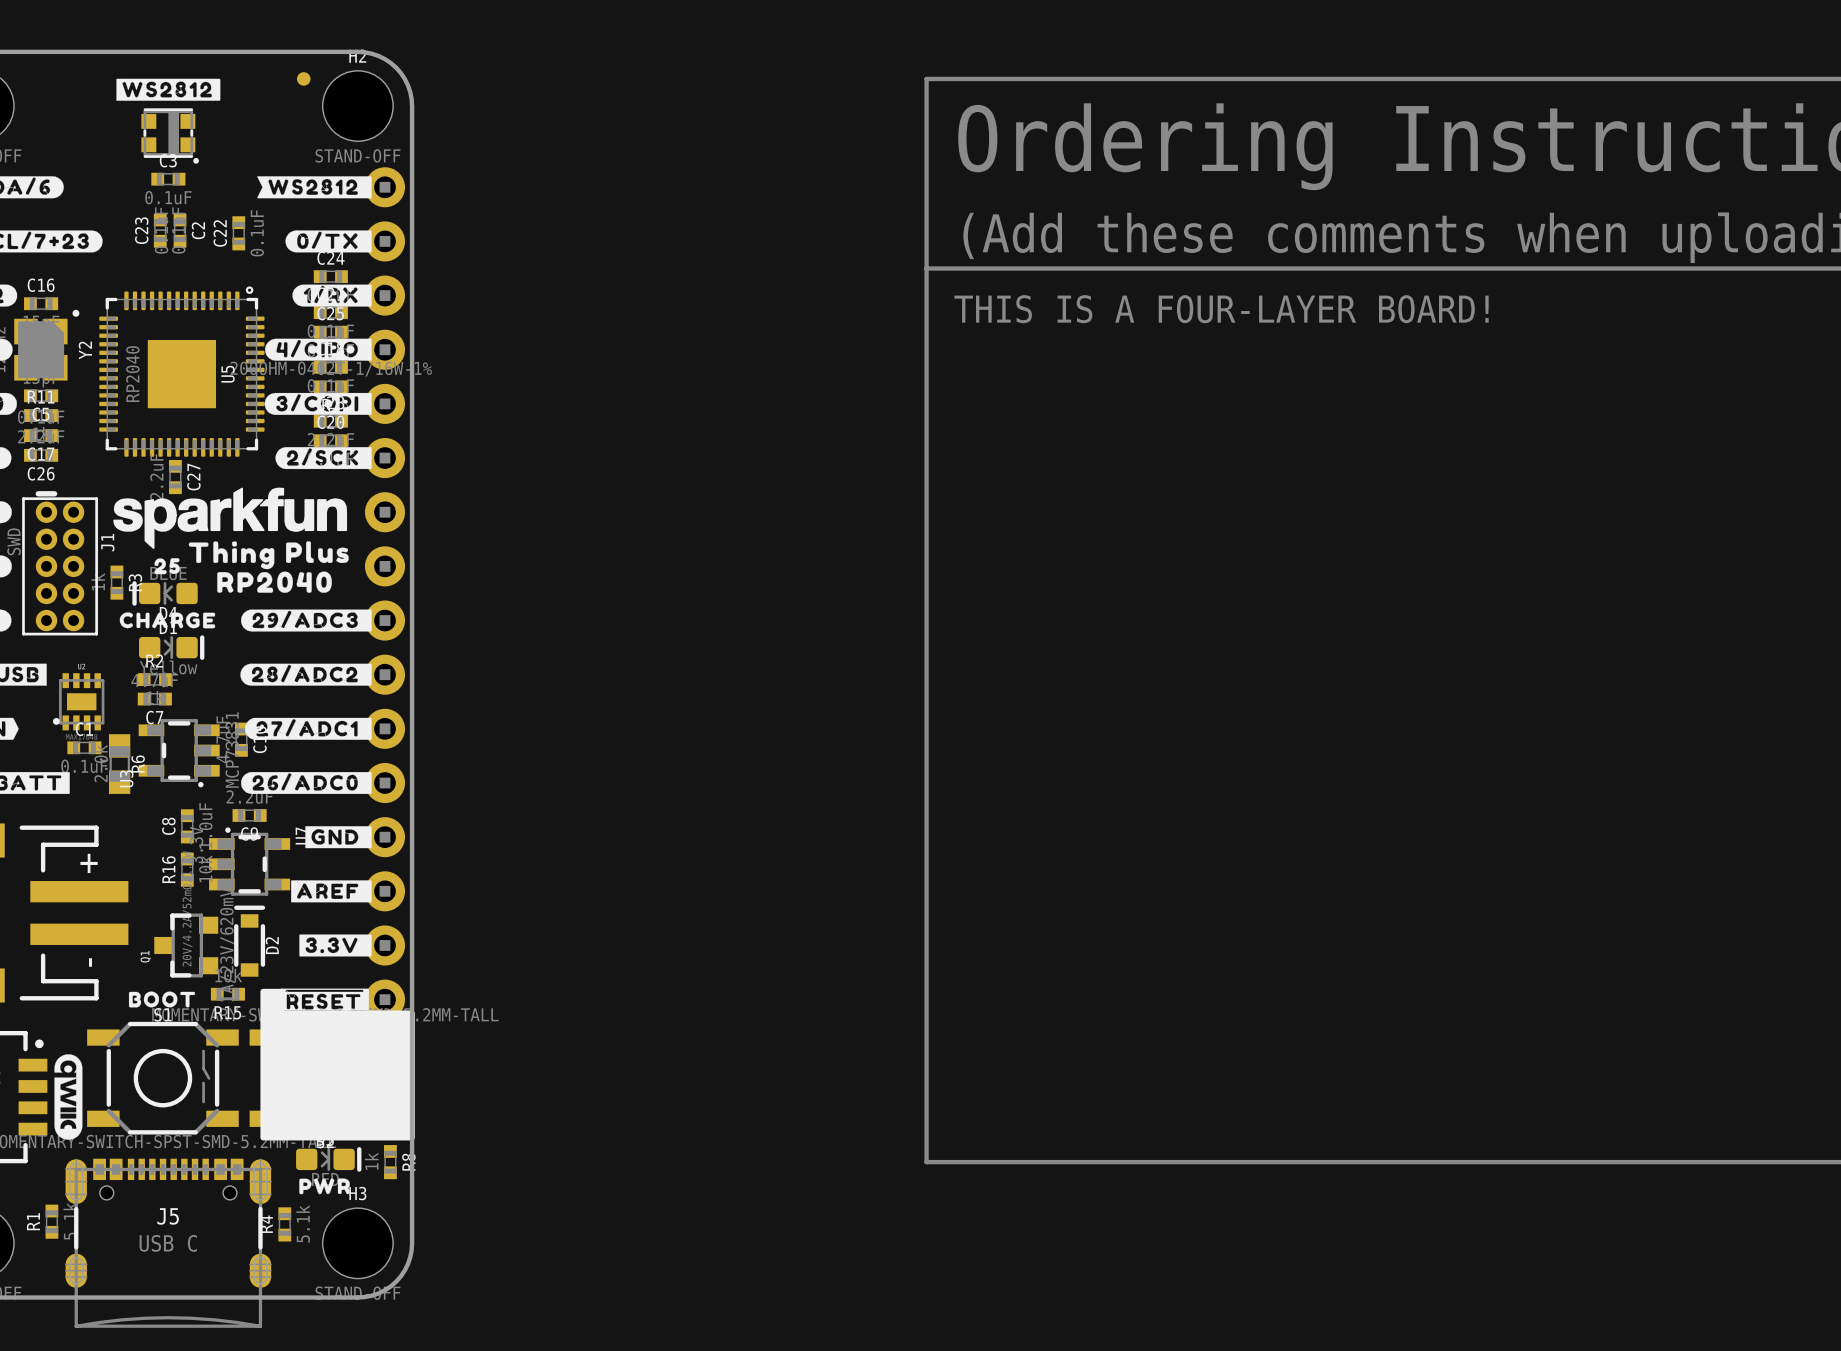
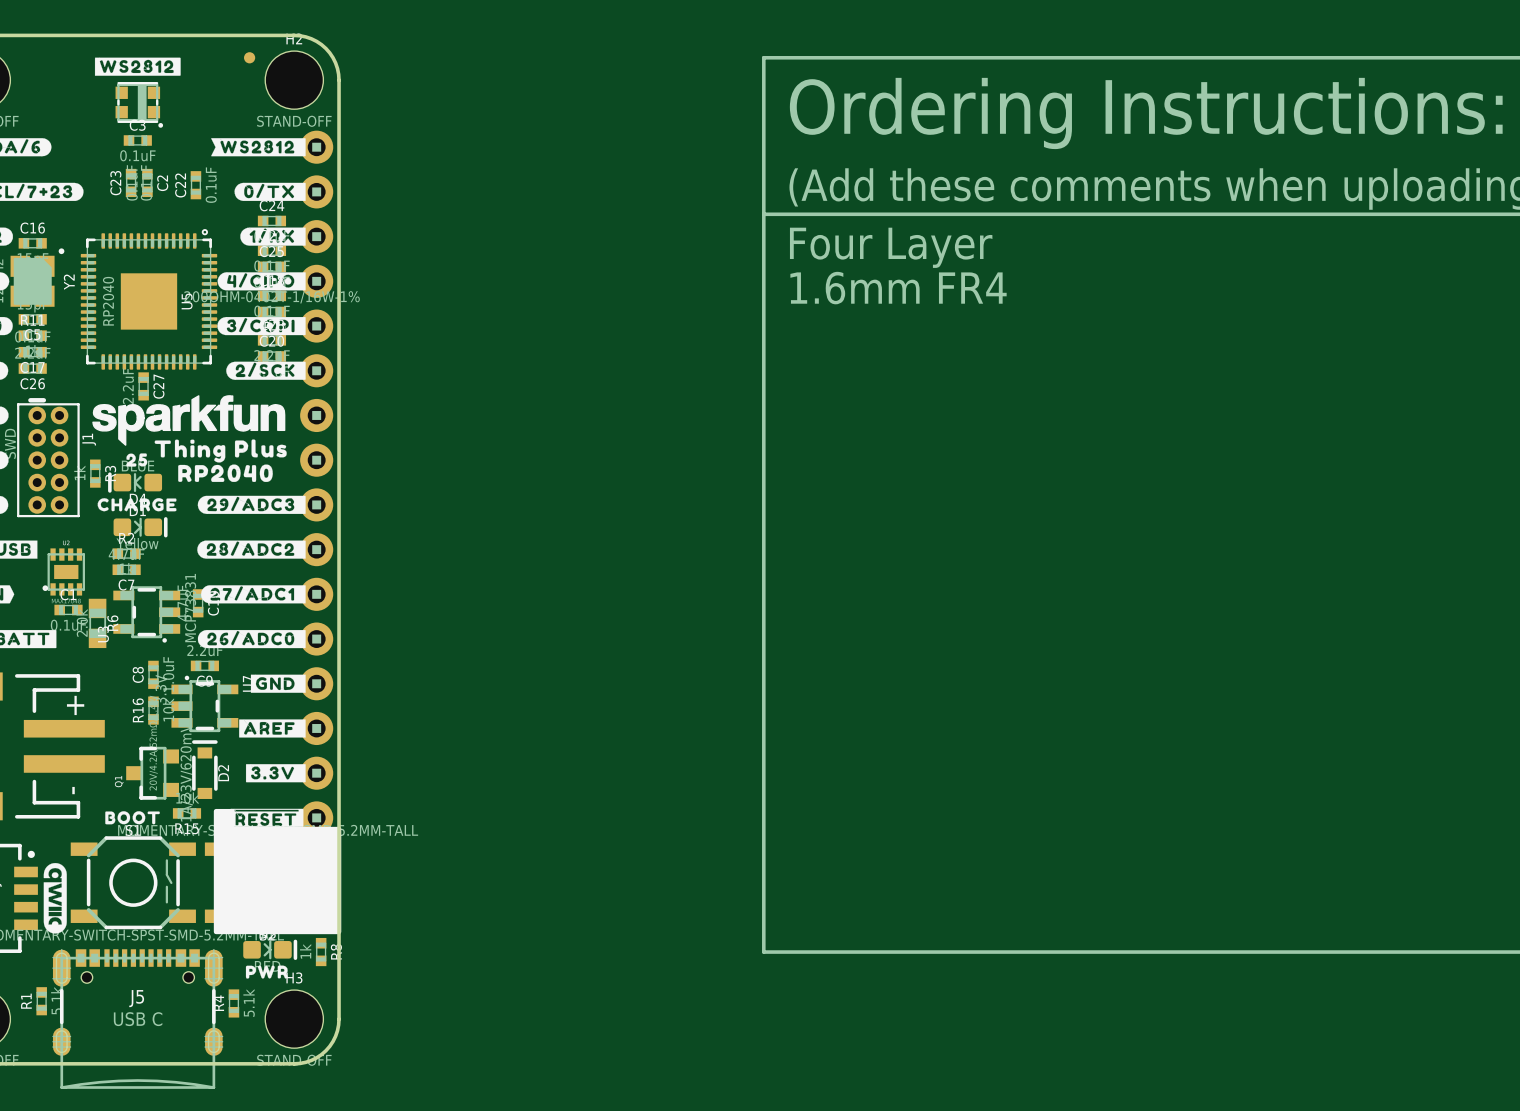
drawing: [954, 295, 1489, 324] -> none
text: none -> Four Layer (891, 247)
text: none -> 1.6mm FR4 (898, 288)

